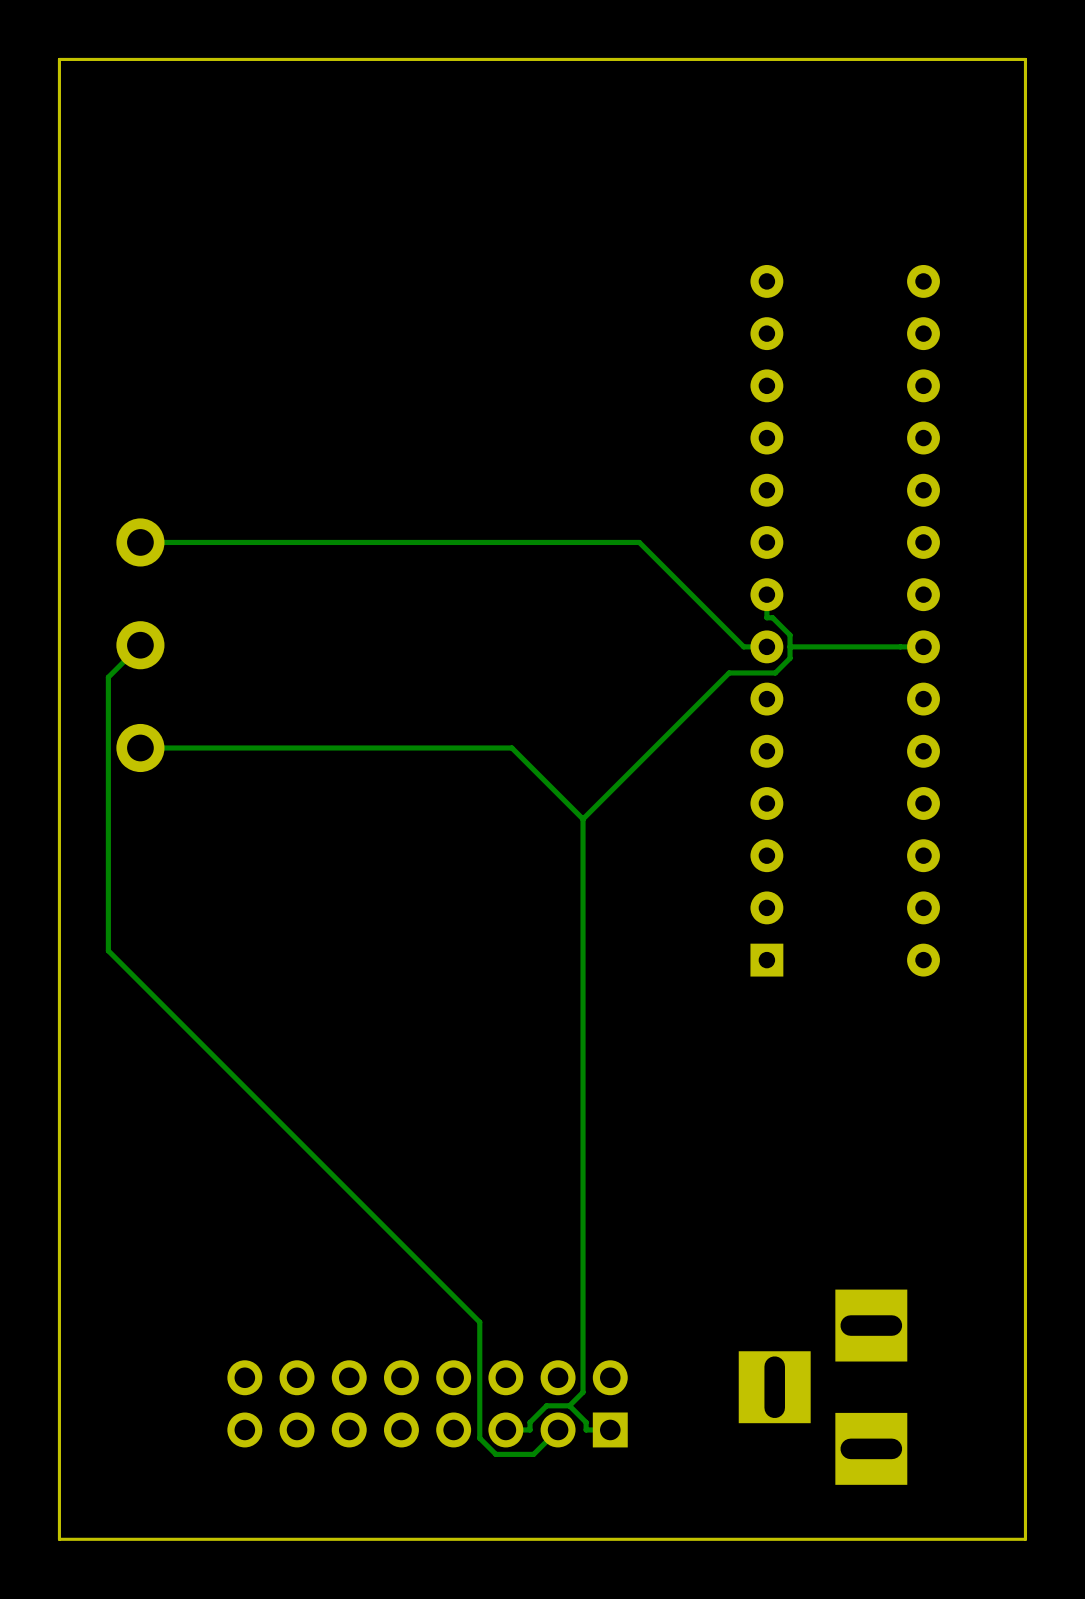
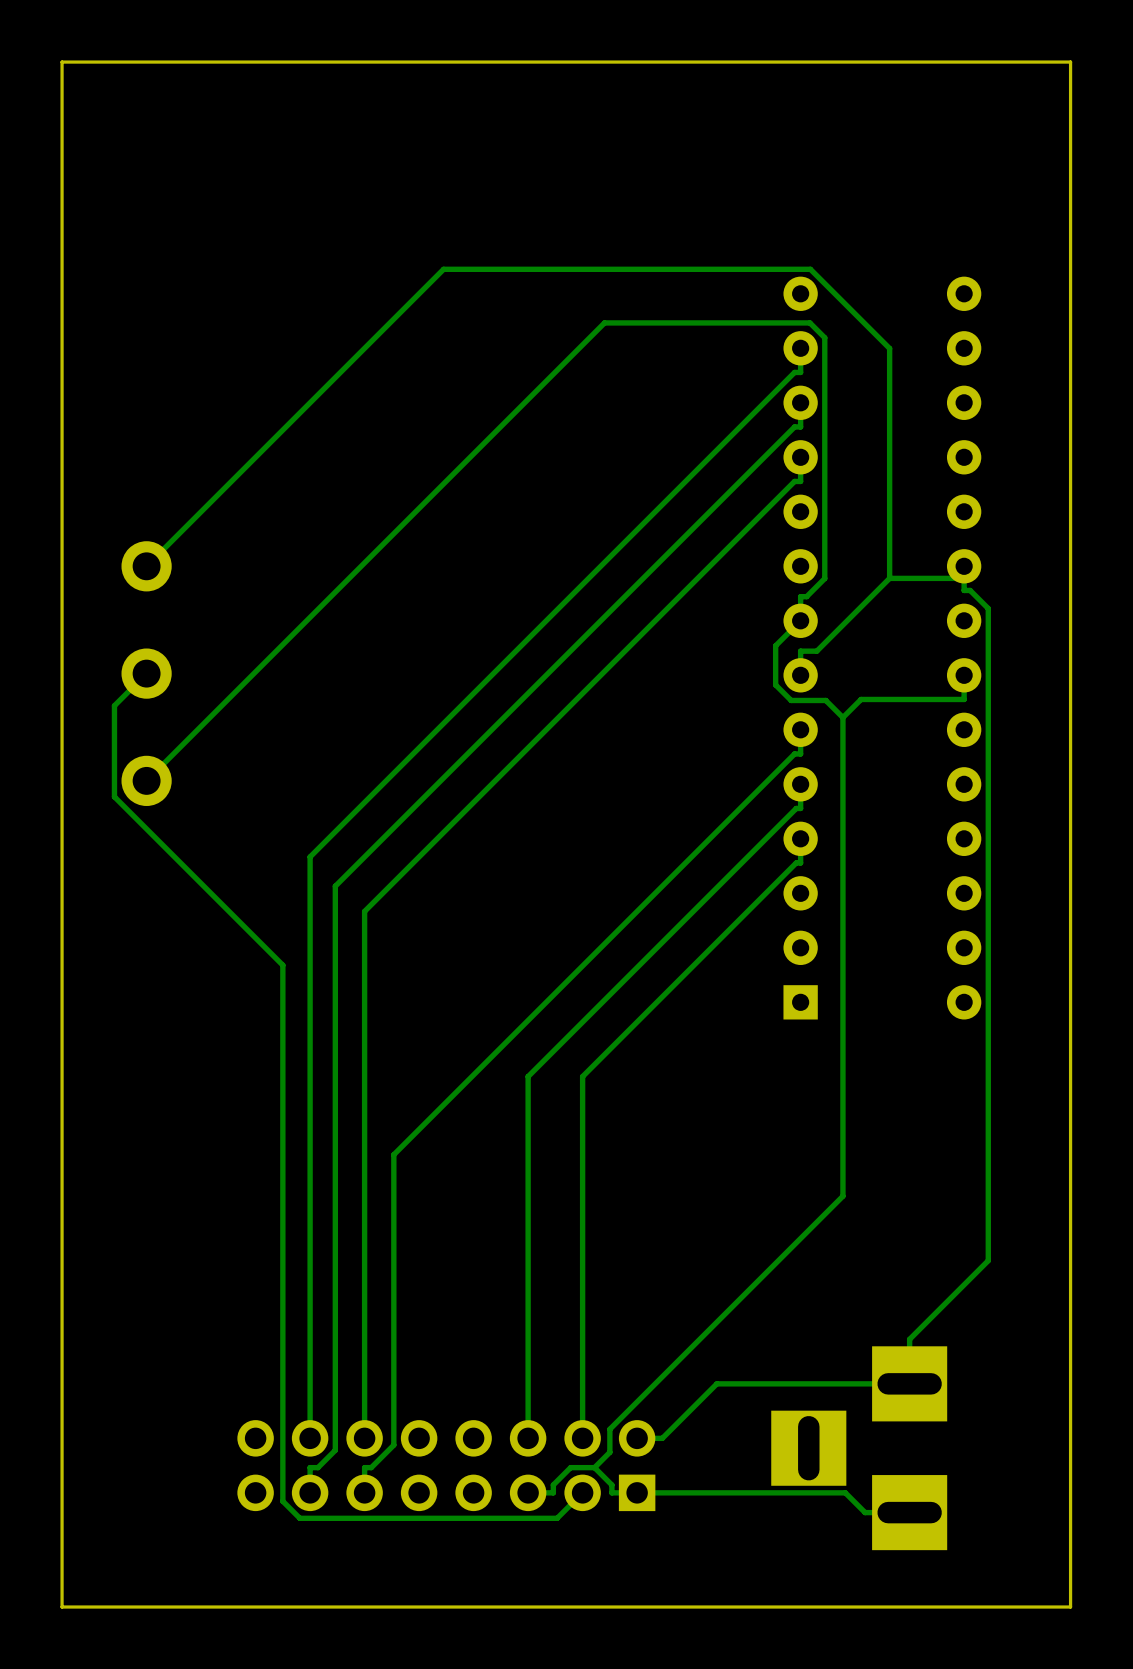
track: none -> (800, 348) (800, 372) (794, 372) (310, 856) (310, 1438)
track: none -> (800, 402) (800, 426) (794, 426) (335, 886) (335, 1450) (317, 1467) (310, 1467) (310, 1492)
track: none -> (800, 457) (800, 481) (794, 481) (364, 911) (364, 1438)
track: (140, 542) (639, 542) (743, 646) (766, 646) -> (146, 566) (443, 269) (810, 269) (889, 348) (889, 578)
track: none -> (964, 566) (964, 590) (970, 590) (988, 608) (988, 1260) (909, 1339) (909, 1383) (716, 1383) (662, 1438) (637, 1438)
track: none -> (889, 578) (816, 651) (800, 651) (800, 675)
track: none -> (964, 578) (889, 578)
track: (766, 594) (766, 617) (772, 617) (790, 635) (790, 658) (775, 672) (729, 672) (583, 819) -> none
track: (923, 646) (790, 646) -> (964, 675) (964, 699) (861, 699) (842, 717)
track: (109, 676) (108, 950) (479, 1322) (479, 1438) (495, 1454) -> (114, 705) (114, 796) (282, 965) (282, 1501) (299, 1518) (517, 1518)
track: none -> (800, 729) (800, 753) (794, 753) (393, 1154) (393, 1445) (371, 1467) (364, 1467) (364, 1492)
track: (140, 747) (511, 747) (583, 819) -> (146, 780) (604, 322) (809, 322) (824, 337) (824, 578) (806, 596) (800, 596) (800, 620) (775, 645) (775, 684) (791, 700) (825, 700) (842, 717)
track: none -> (800, 784) (800, 808) (796, 808) (528, 1076) (528, 1438)
track: none -> (800, 838) (800, 862) (796, 862) (582, 1076) (582, 1438)
track: (583, 819) (583, 1392) -> (842, 717) (842, 1196) (609, 1429) (608, 1453)
track: none -> (637, 1492) (845, 1492) (865, 1512) (909, 1512)

